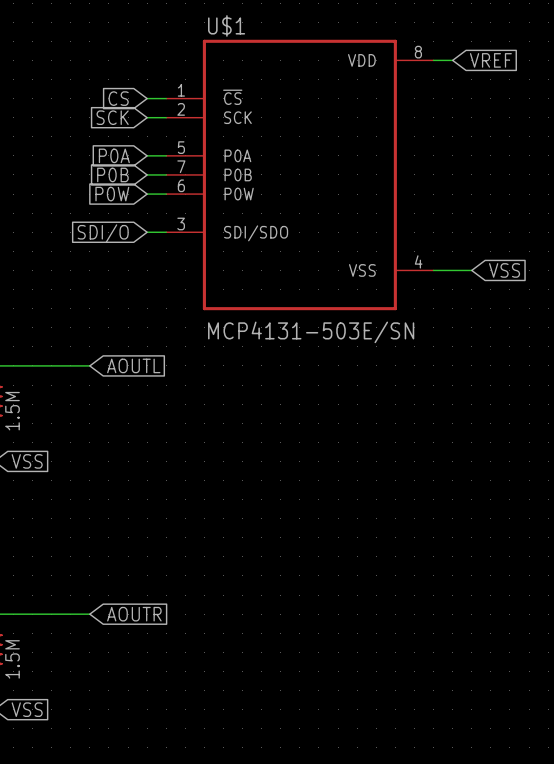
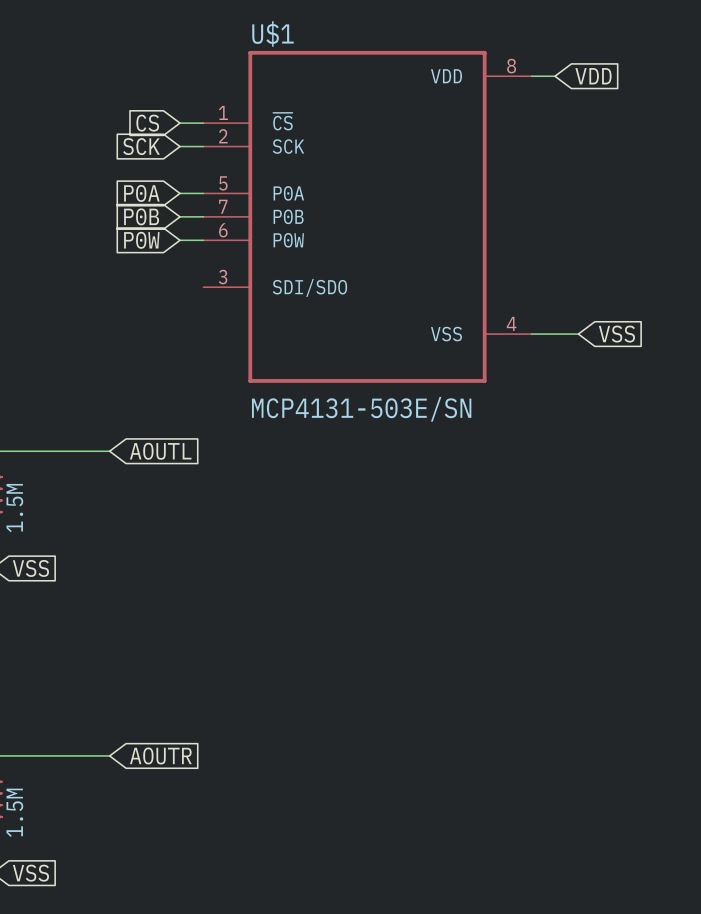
global label: VREF (490, 60) -> VDD (593, 76)
wire: (147, 232) (166, 232) -> none
global label: SDI/O (103, 233) -> none

